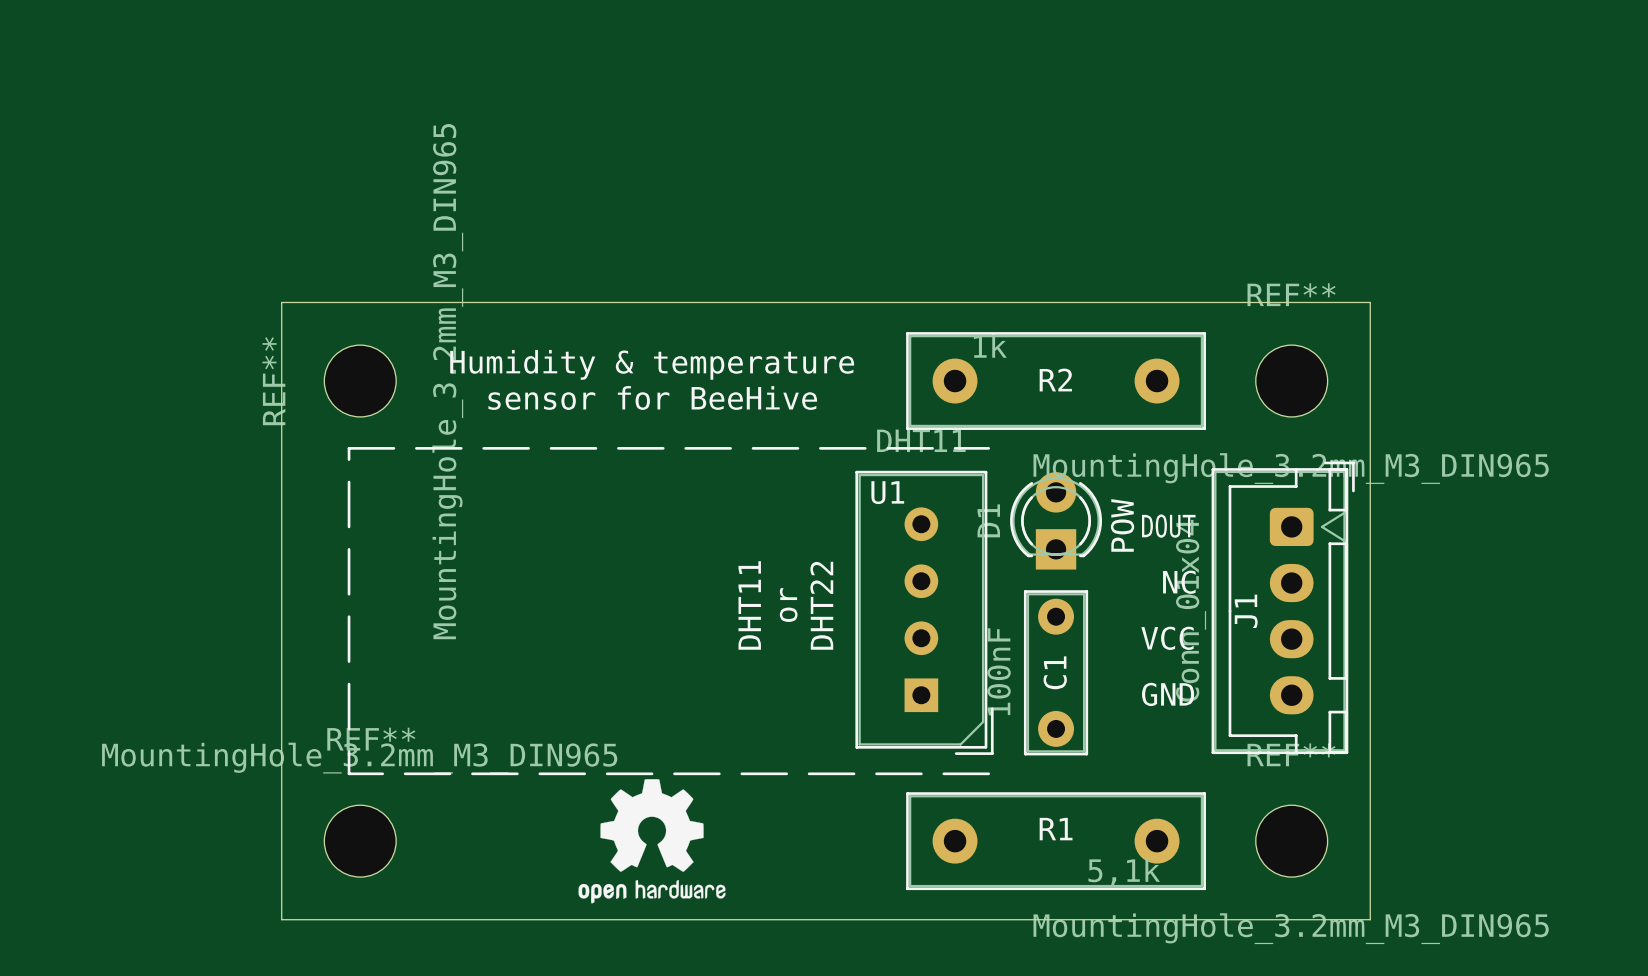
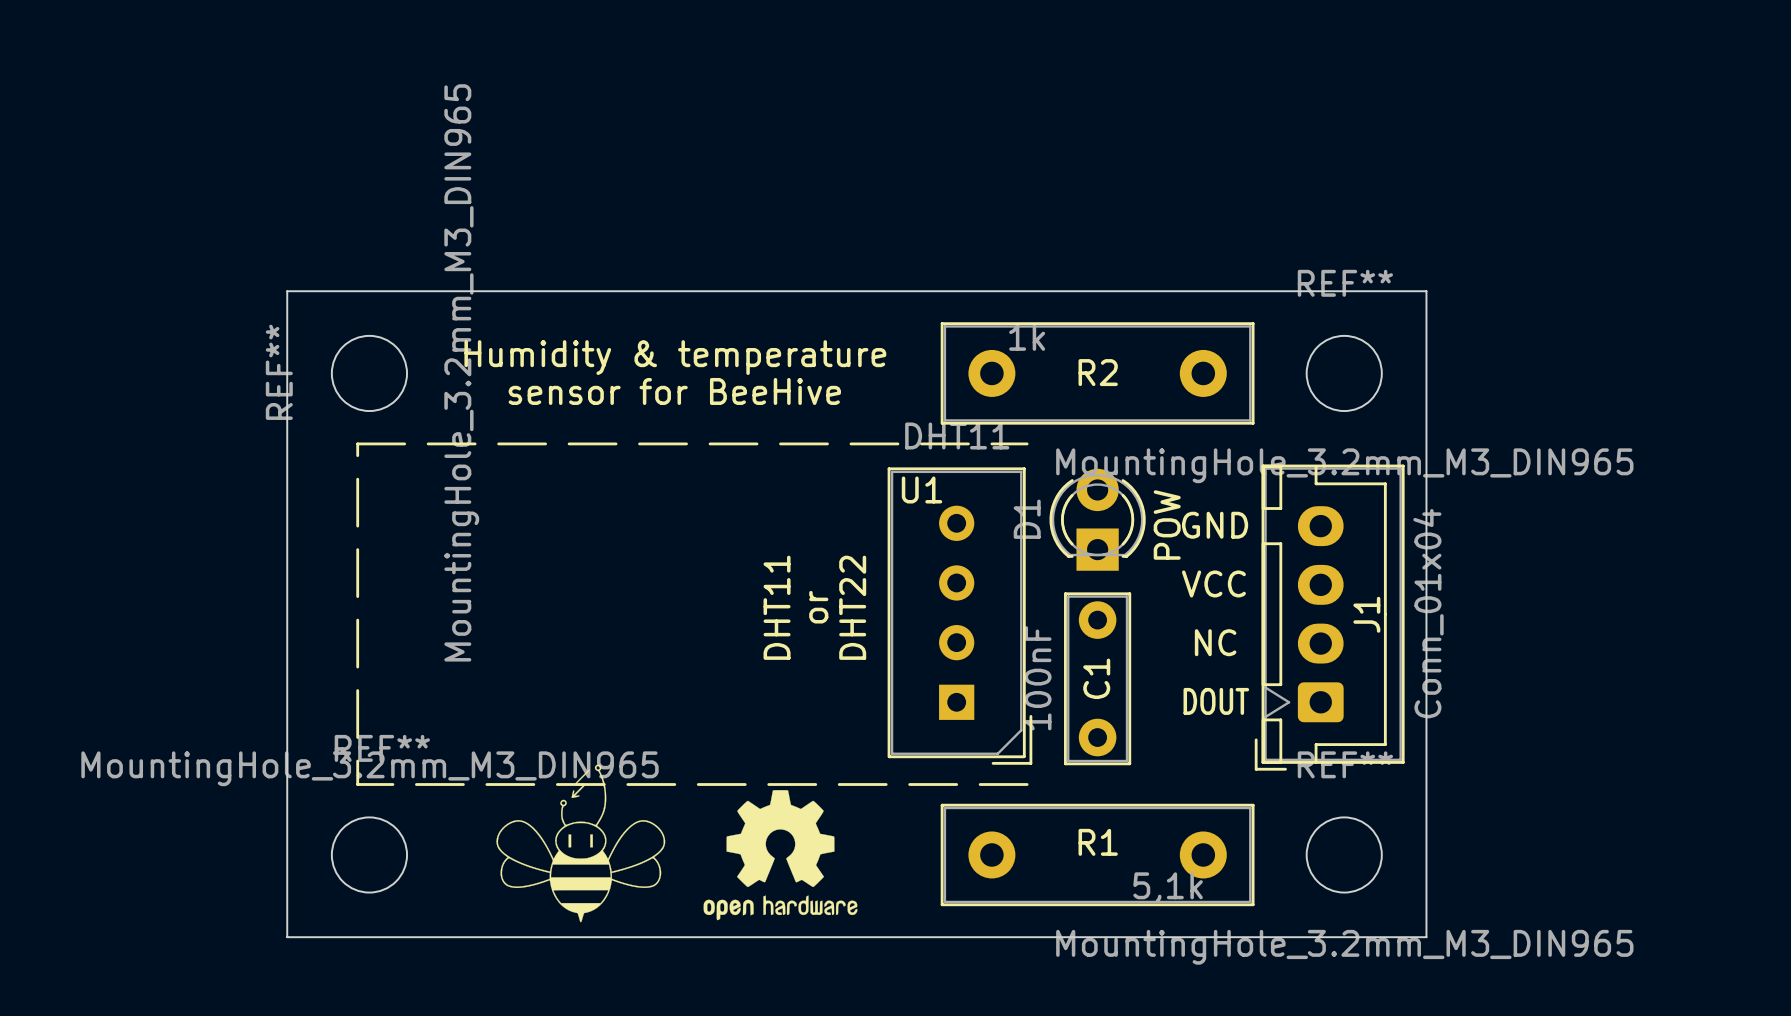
text: DOUT (1168, 526) -> GND (1215, 525)
text: NC (1179, 582) -> VCC (1213, 583)
J1 rotation: 0° (1283, 607) -> 180° (1329, 617)
text: VCC (1167, 638) -> NC (1215, 642)
text: GND (1168, 694) -> DOUT (1216, 701)
drawing: none -> [496, 764, 666, 923]
drawing position: (652, 841) -> (780, 855)

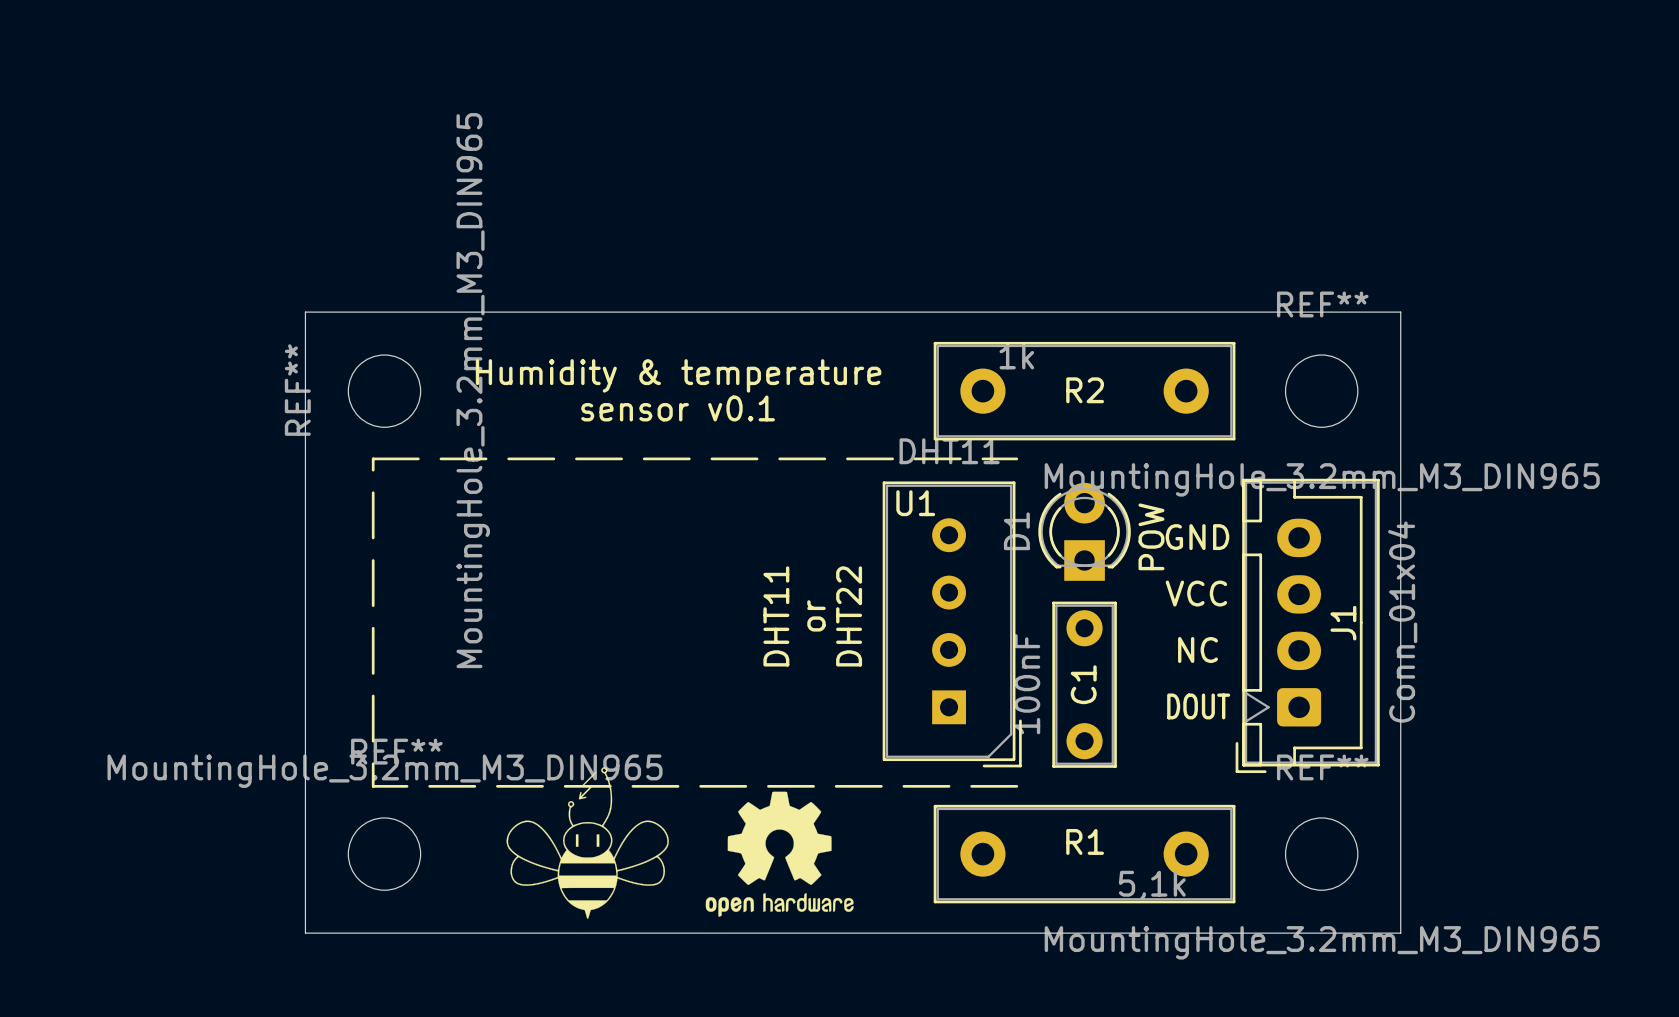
text: sensor for BeeHive (674, 391) -> sensor v0.1 (678, 408)

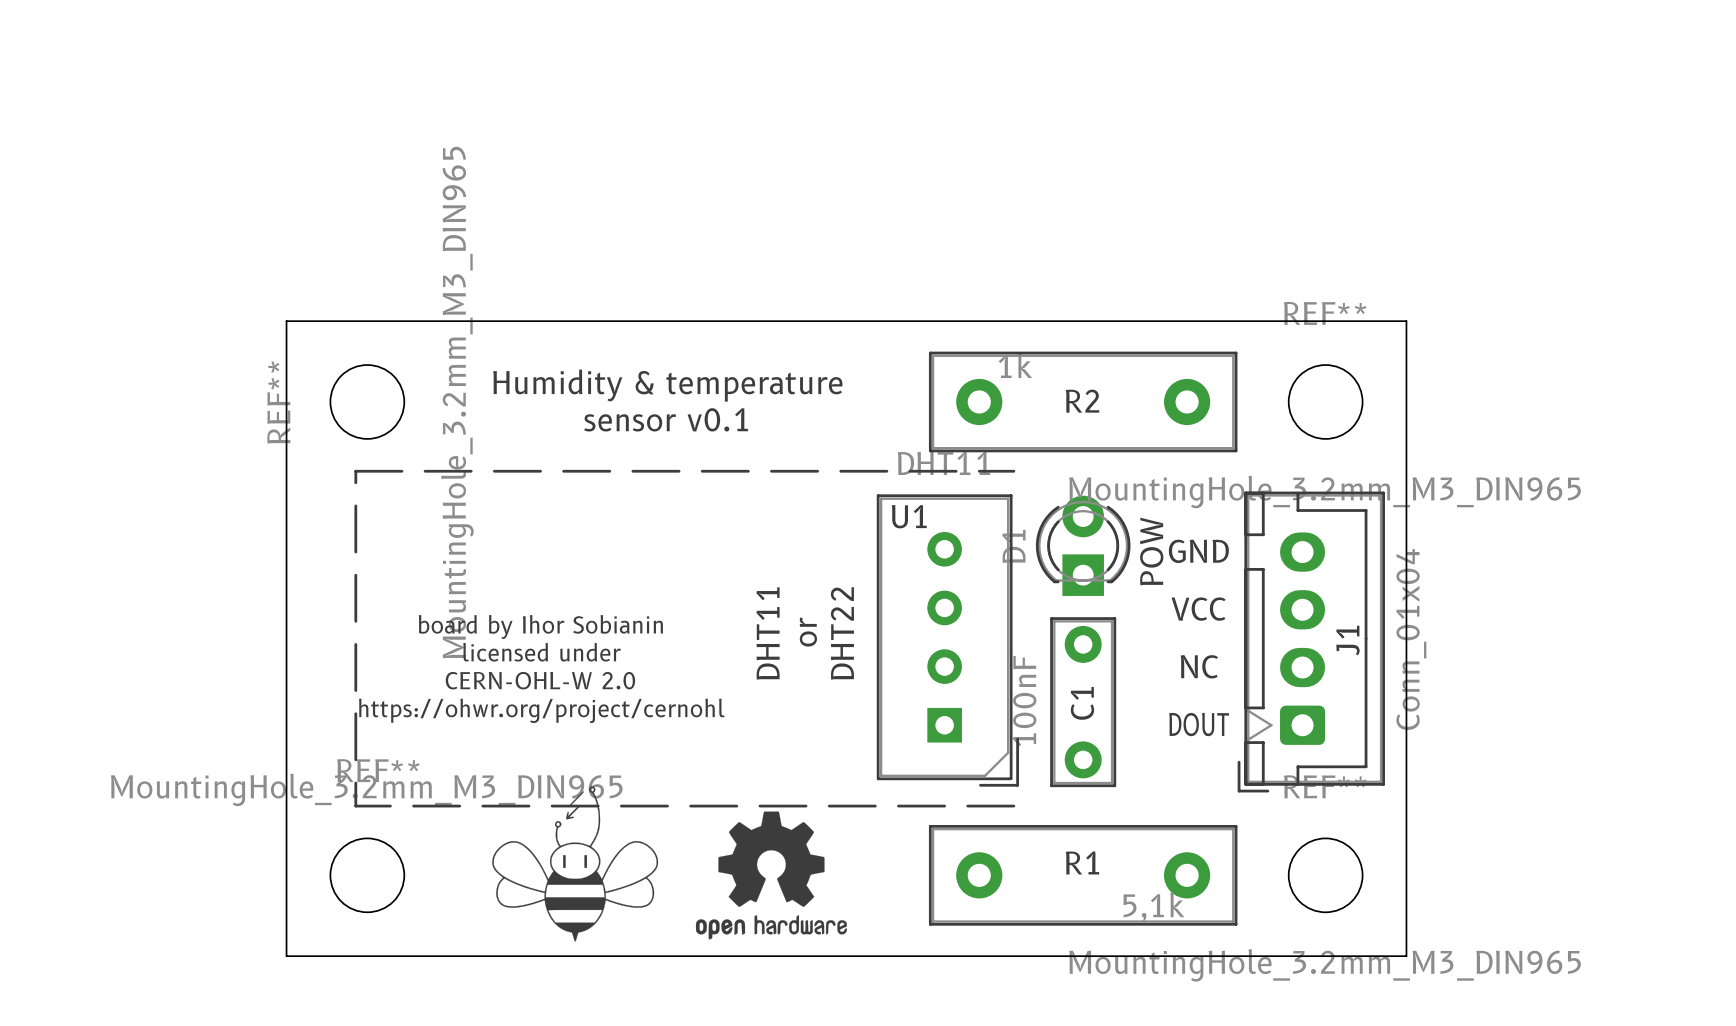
text: none -> board by Ihor Sobianin (540, 626)
text: none -> licensed under (542, 652)
text: none -> CERN-OHL-W 2.0 (540, 680)
text: none -> https://ohwr.org/project/cernohl (541, 710)

